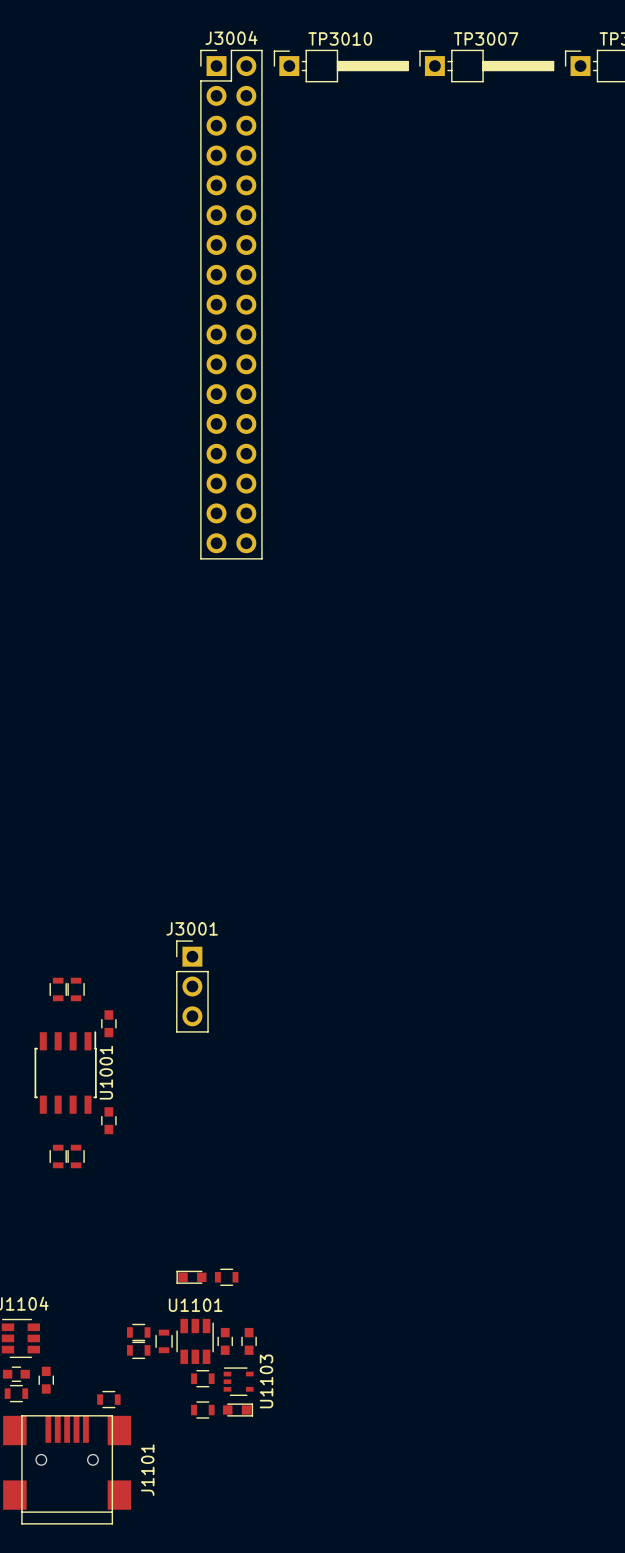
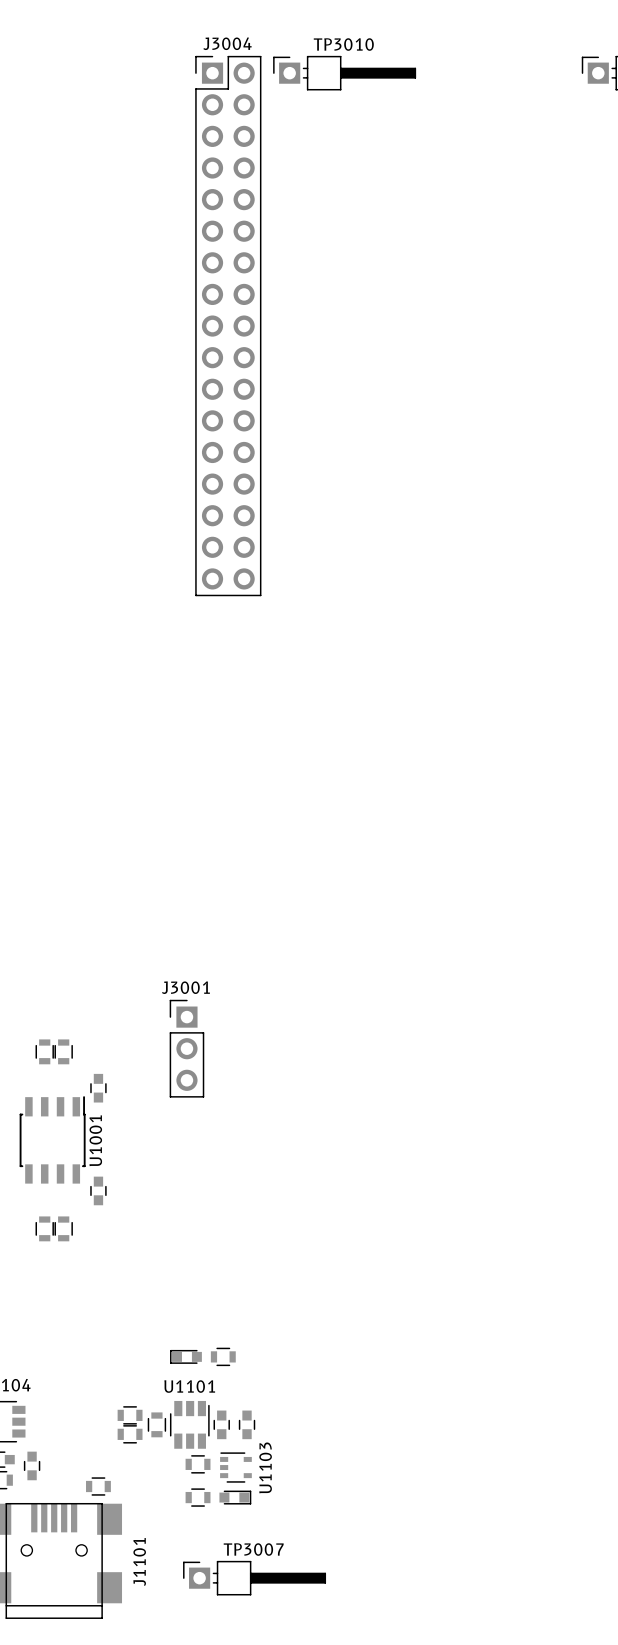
TP3007 position: (486, 66) -> (254, 1578)

